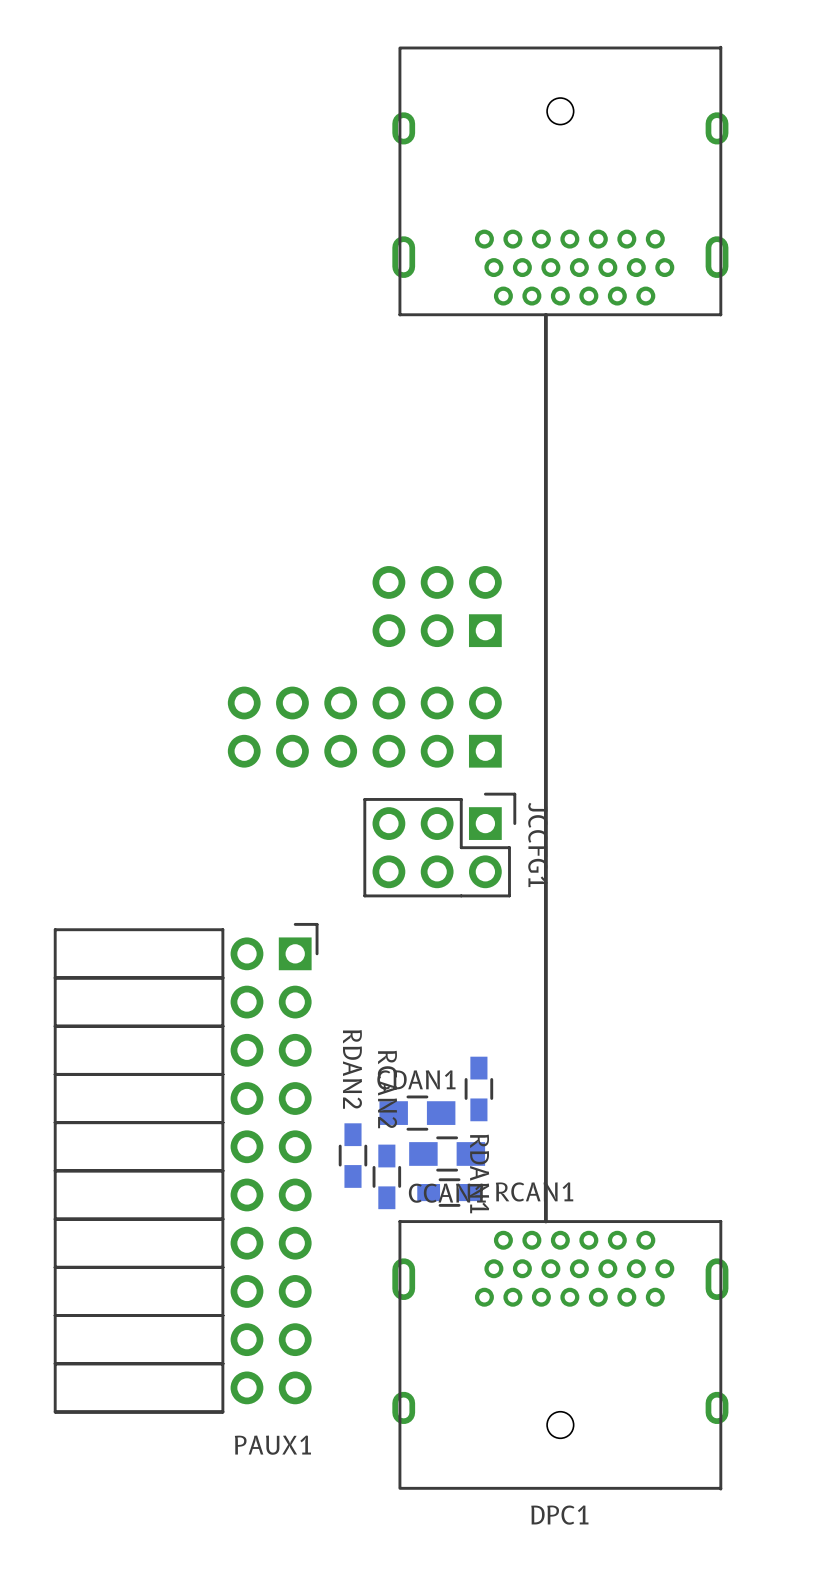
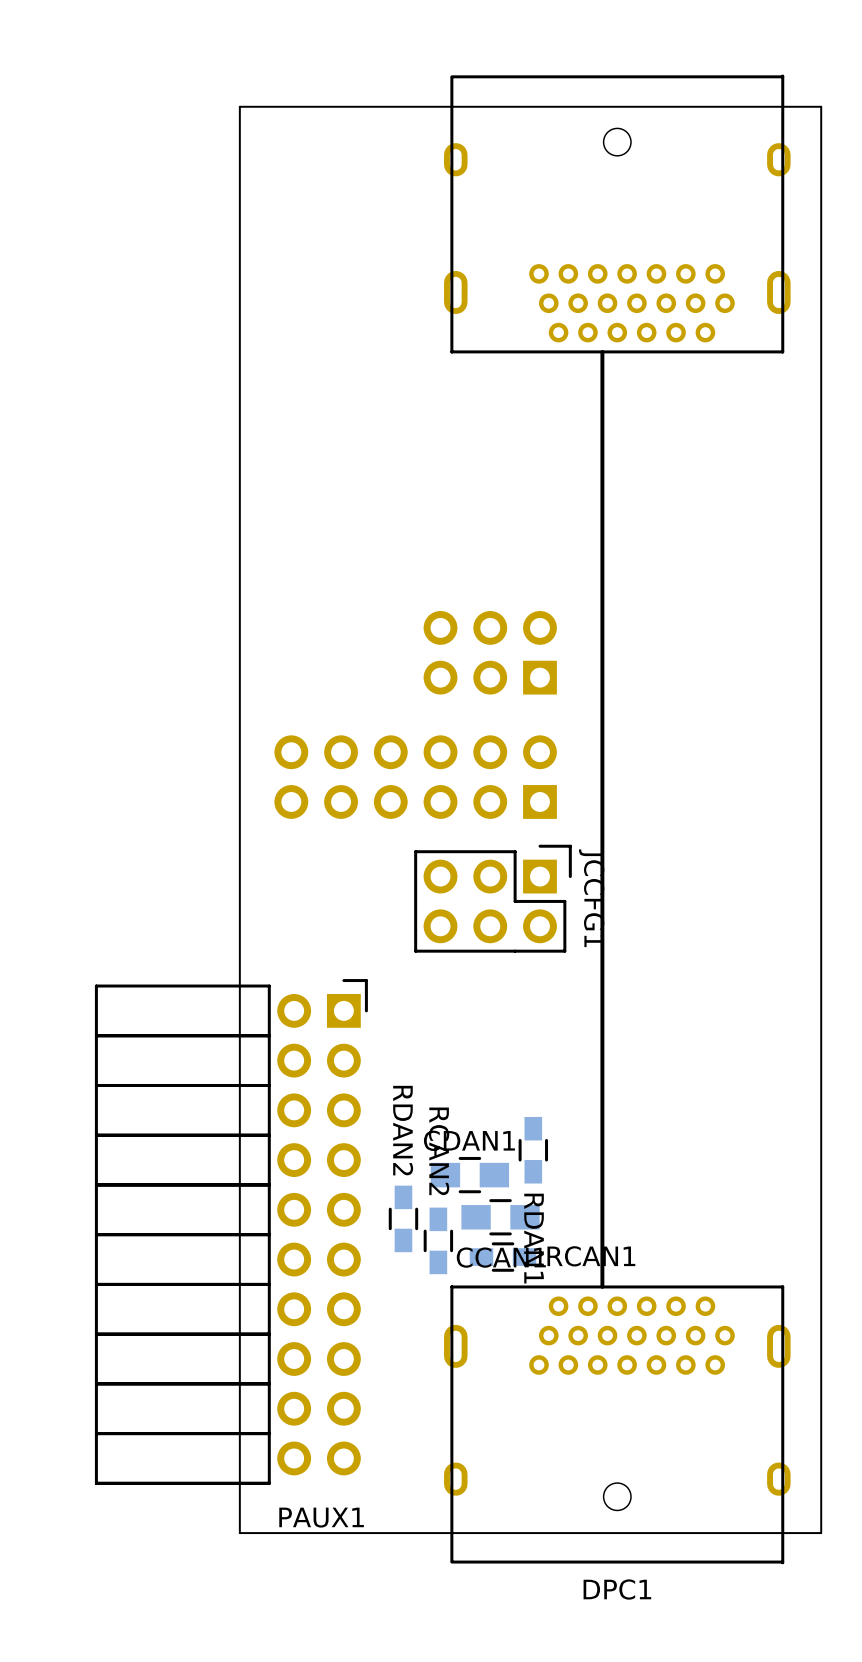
board edge: none -> (821, 1533) (821, 106) (239, 106) (239, 1533) (820, 1533)

